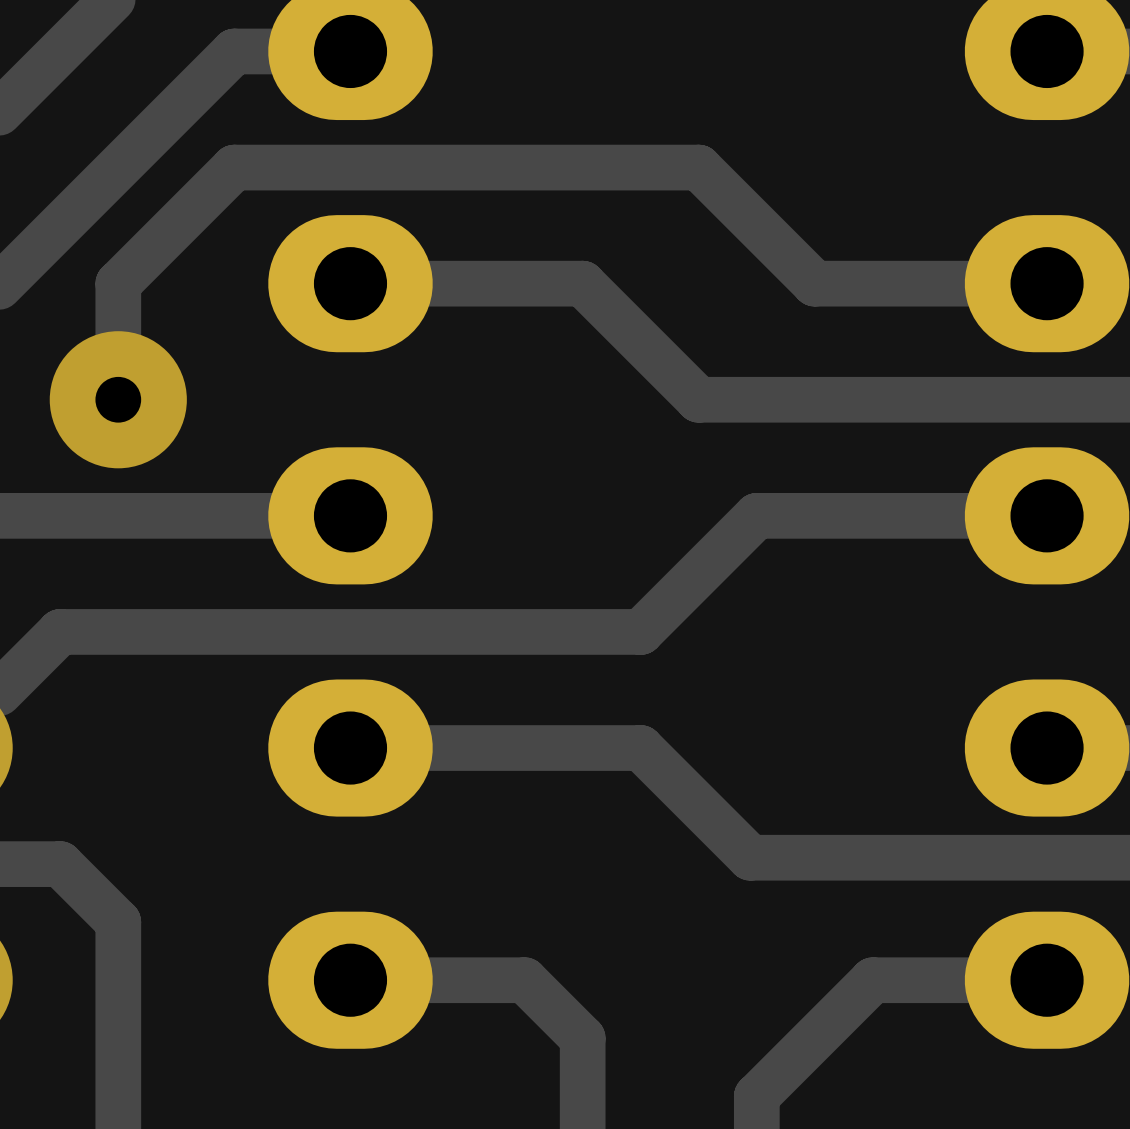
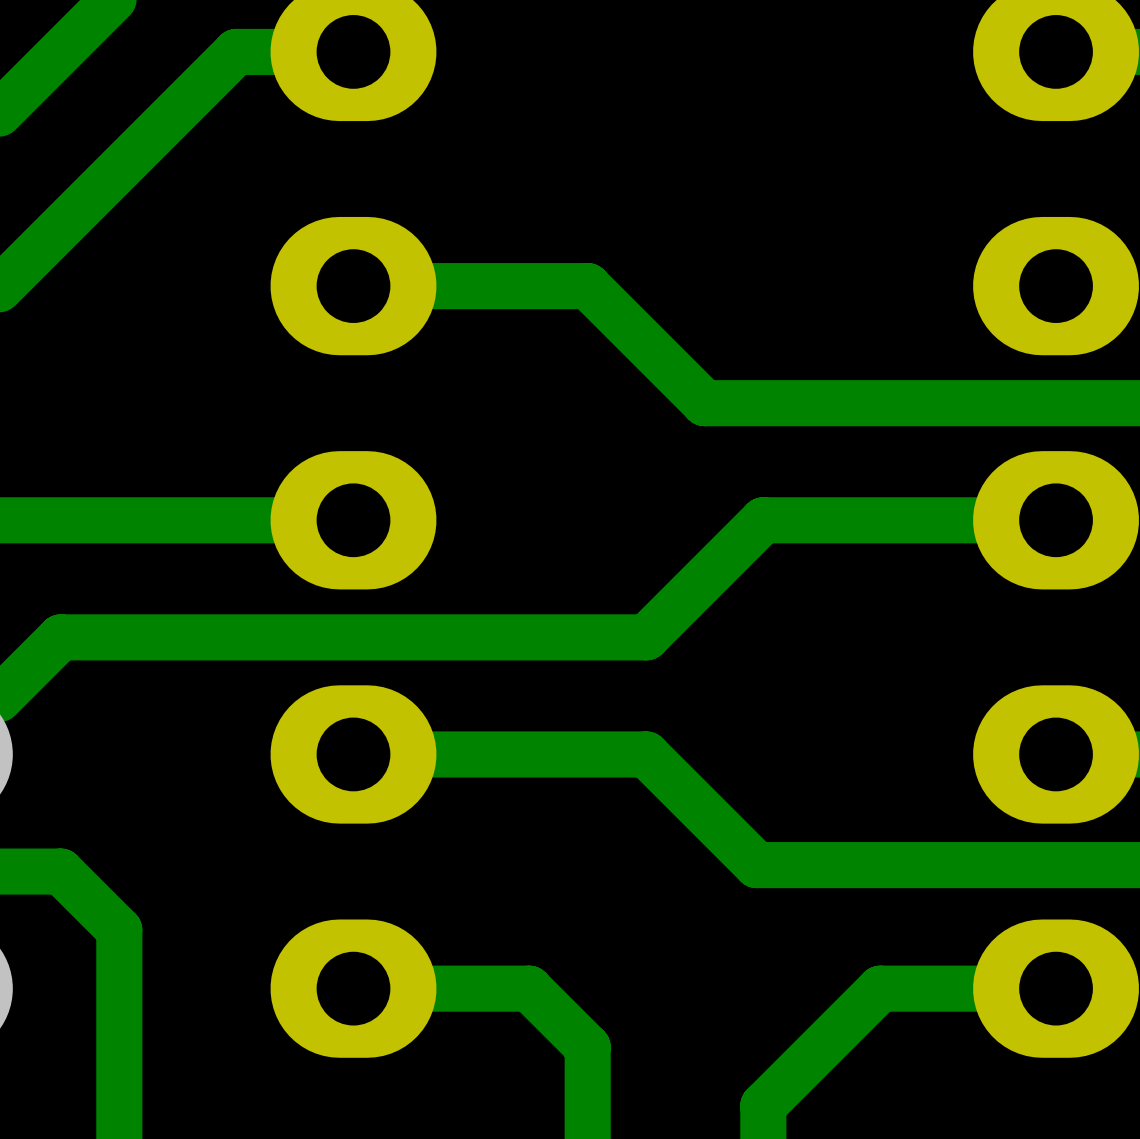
track: (1047, 283) (814, 283) (698, 167) (234, 167) (118, 283) (118, 399) -> none
via: (118, 399) -> none

